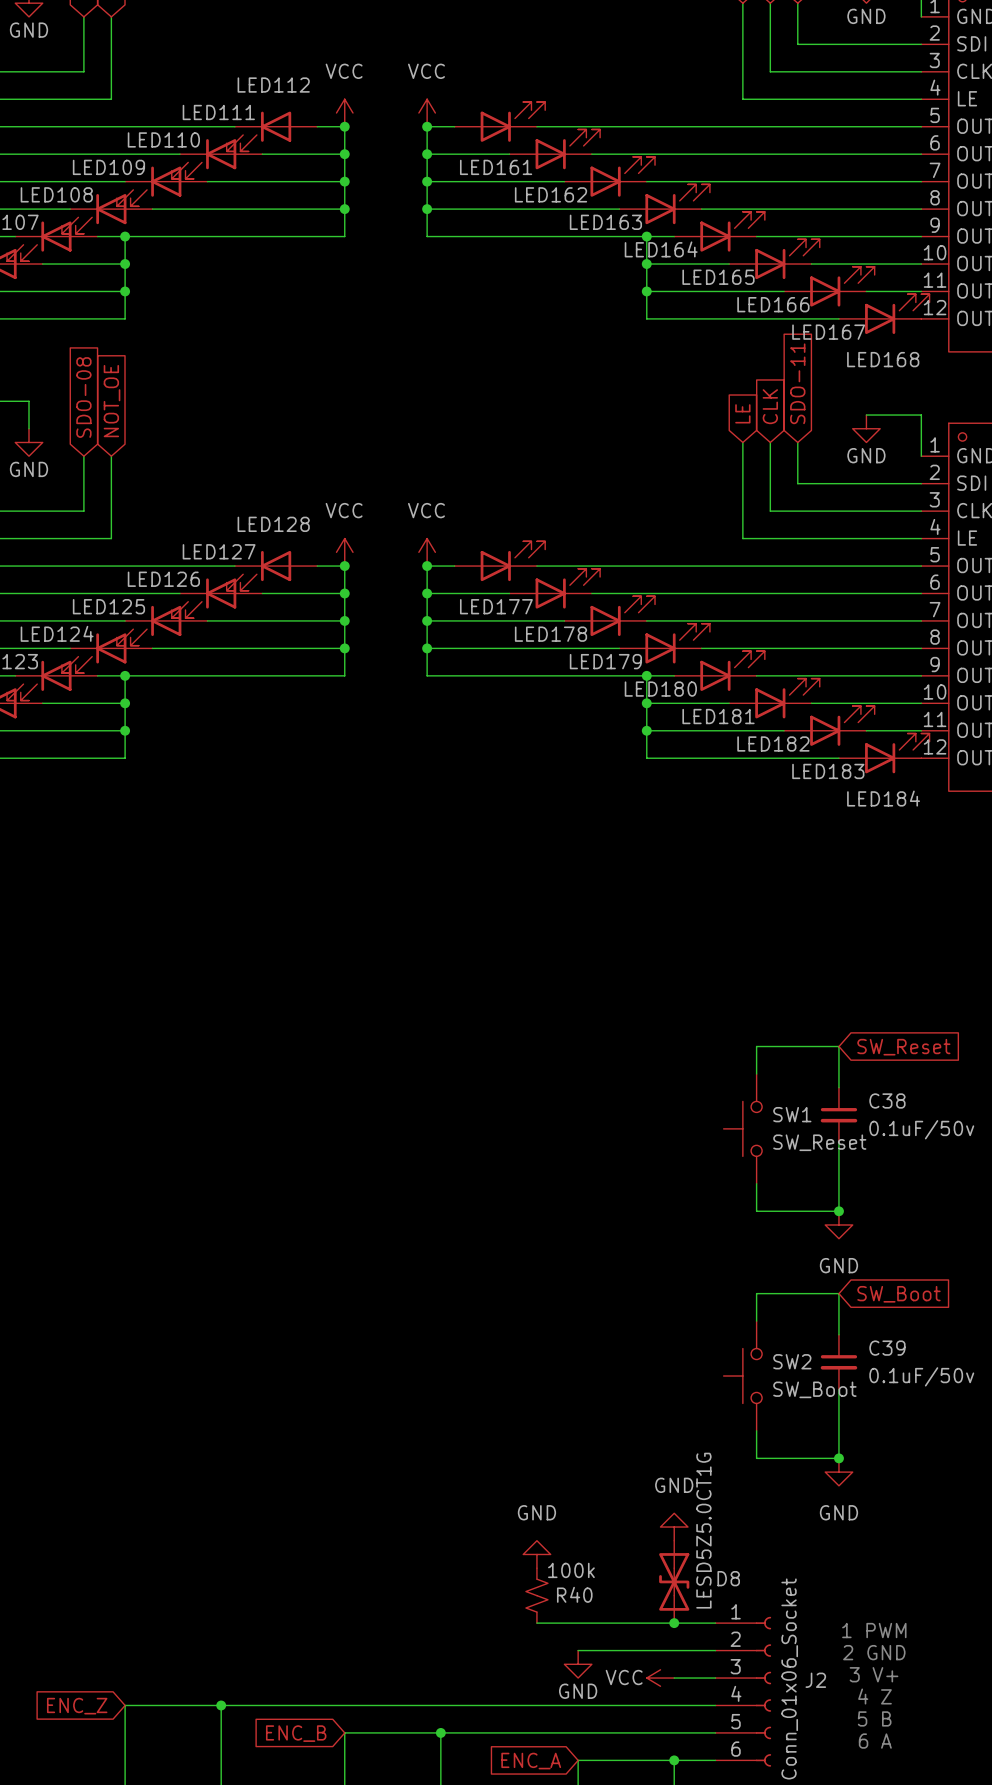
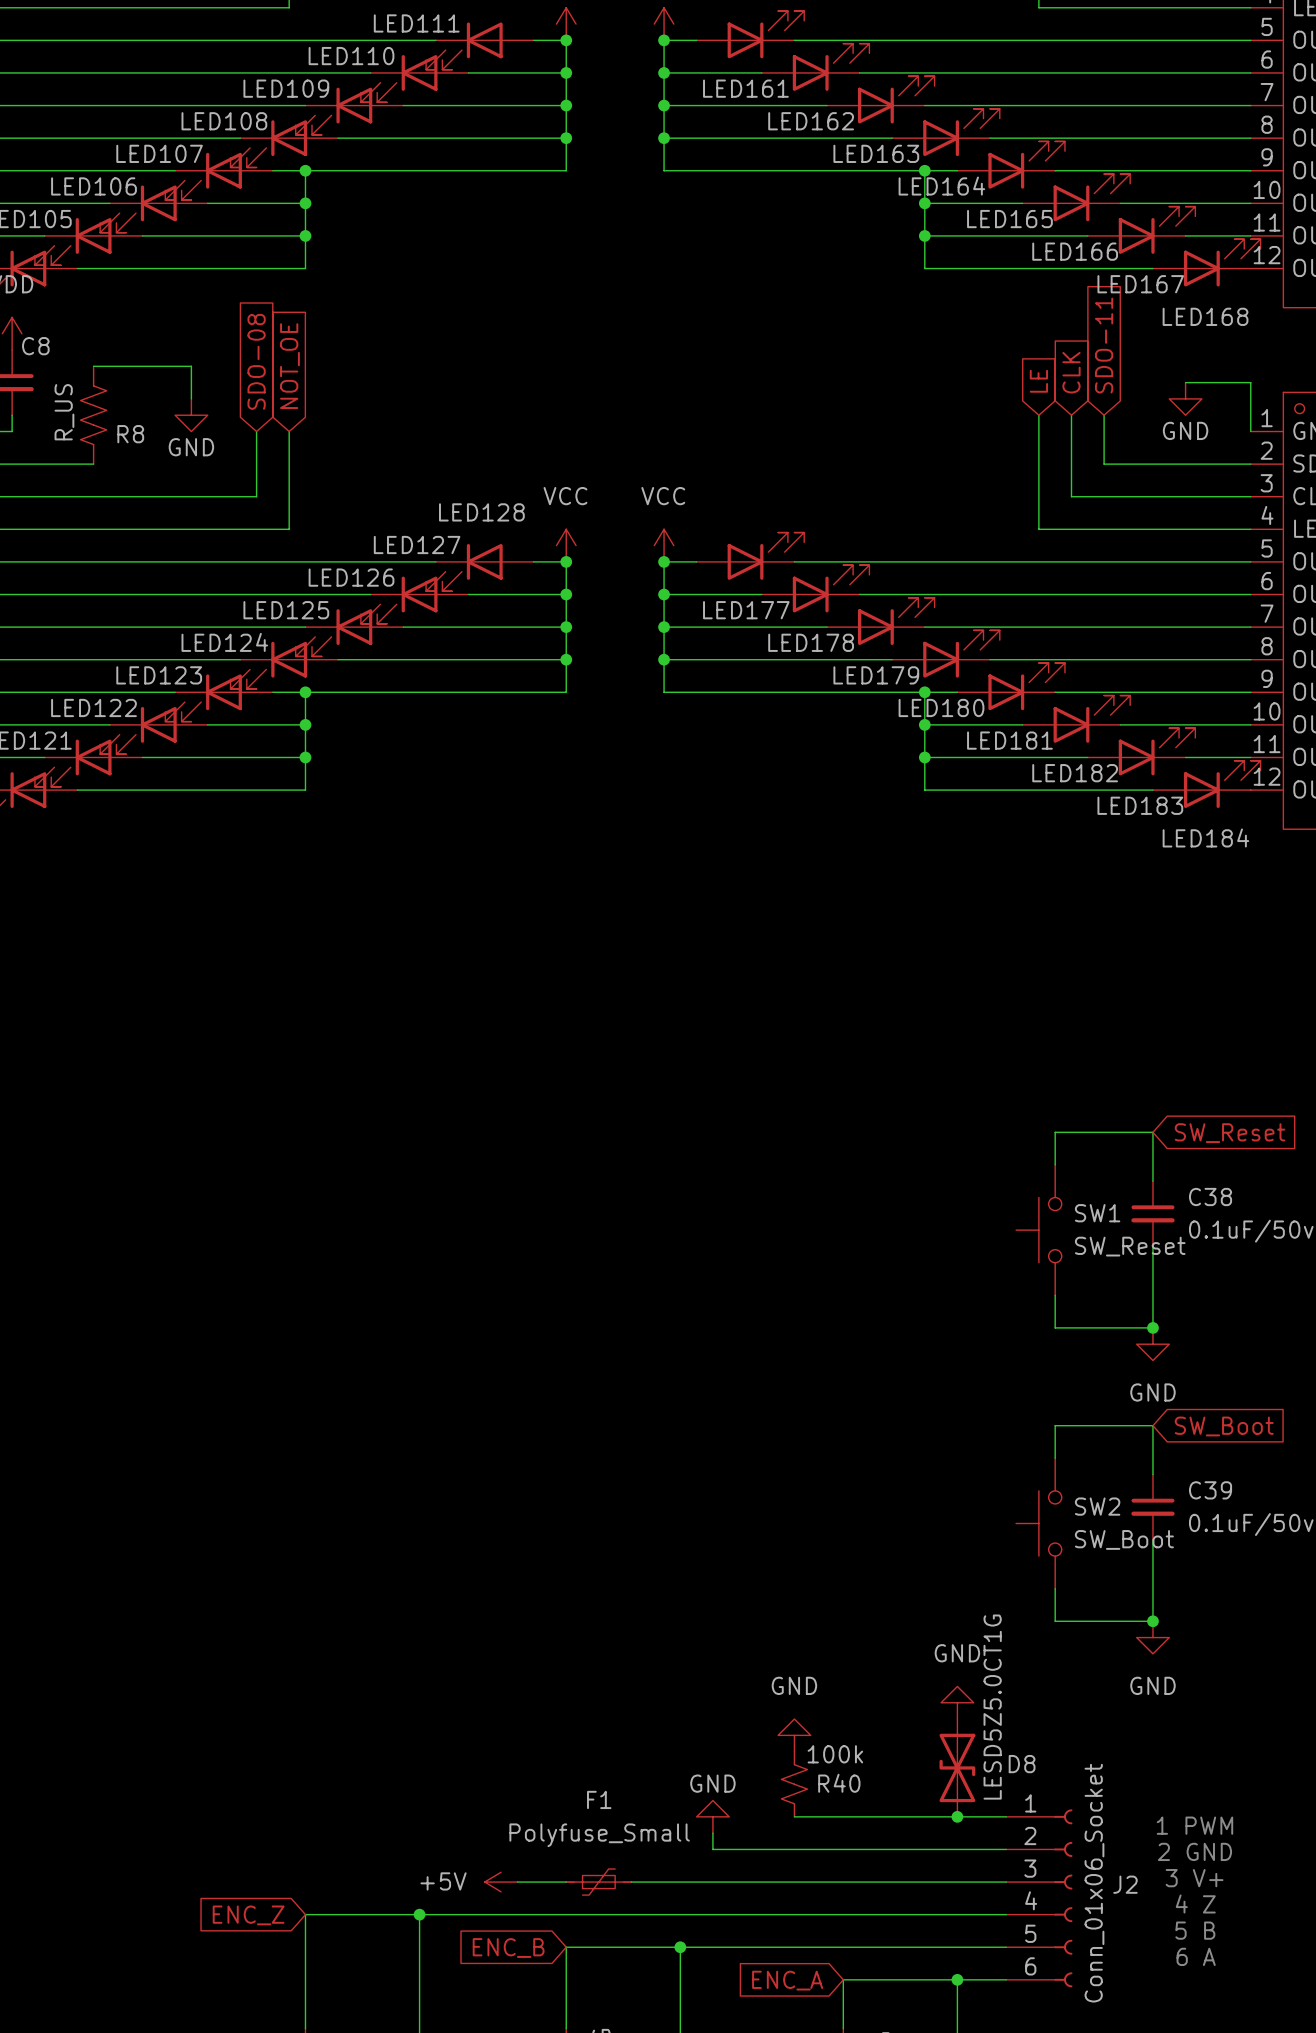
wire: none -> (712, 1833) (712, 1849) (843, 1849)
power symbol rotation: 0° (578, 1664) -> 180° (712, 1816)
power symbol position: GND (578, 1664) -> GND (712, 1816)
power symbol: none -> +5V (501, 1882)
wire: none -> (517, 1882) (566, 1882)
F1: none -> Polyfuse_Small (598, 1882)
wire: none -> (631, 1882) (957, 1882)
power symbol: VCC (660, 1678) -> none

